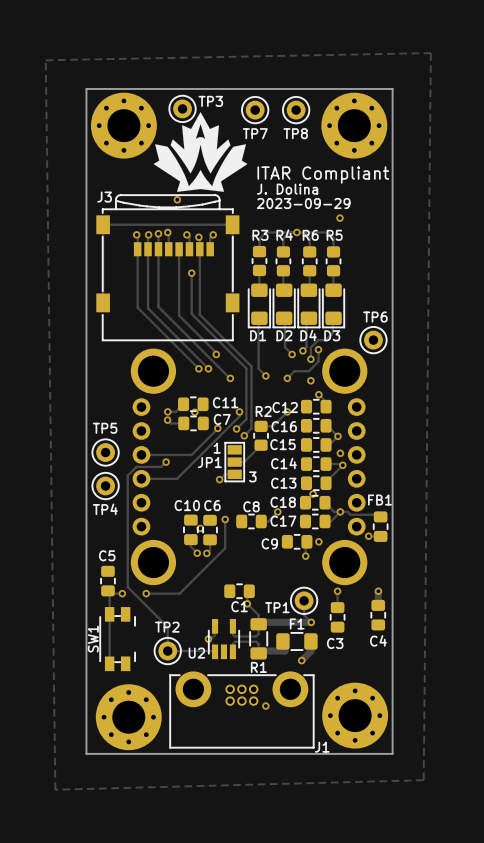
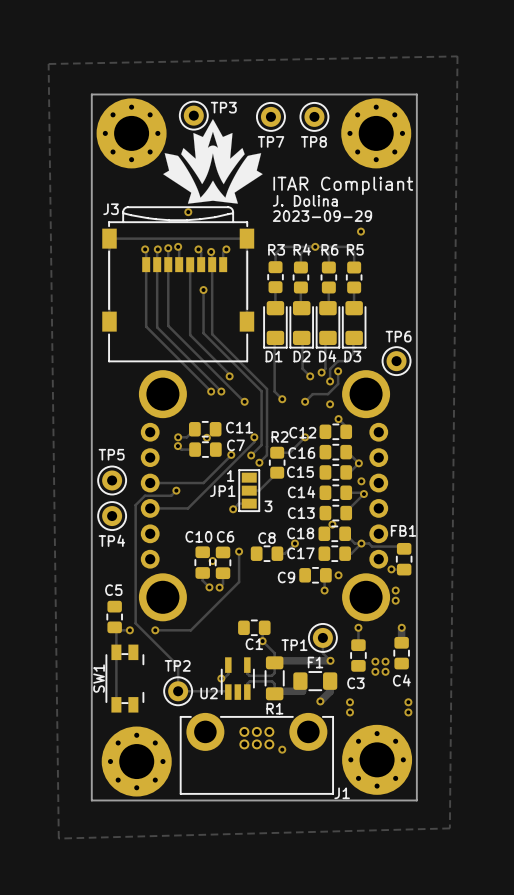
via: none -> (395, 590)
via: none -> (395, 600)
via: none -> (375, 661)
via: none -> (385, 661)
via: none -> (375, 671)
via: none -> (385, 671)
via: none -> (349, 702)
via: none -> (408, 702)
via: none -> (349, 712)
via: none -> (408, 712)

